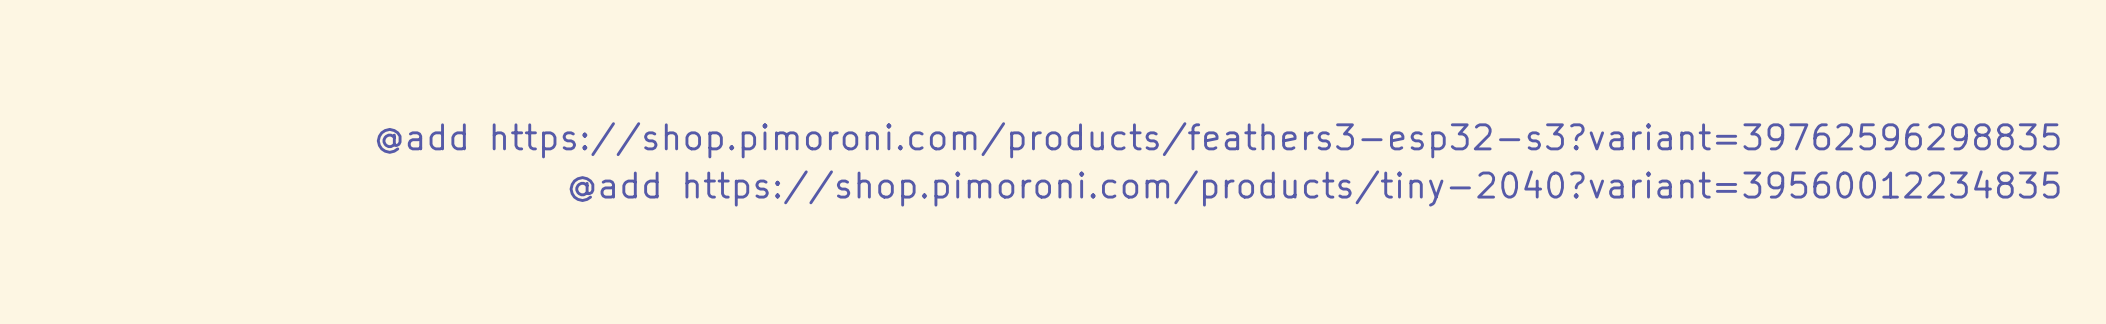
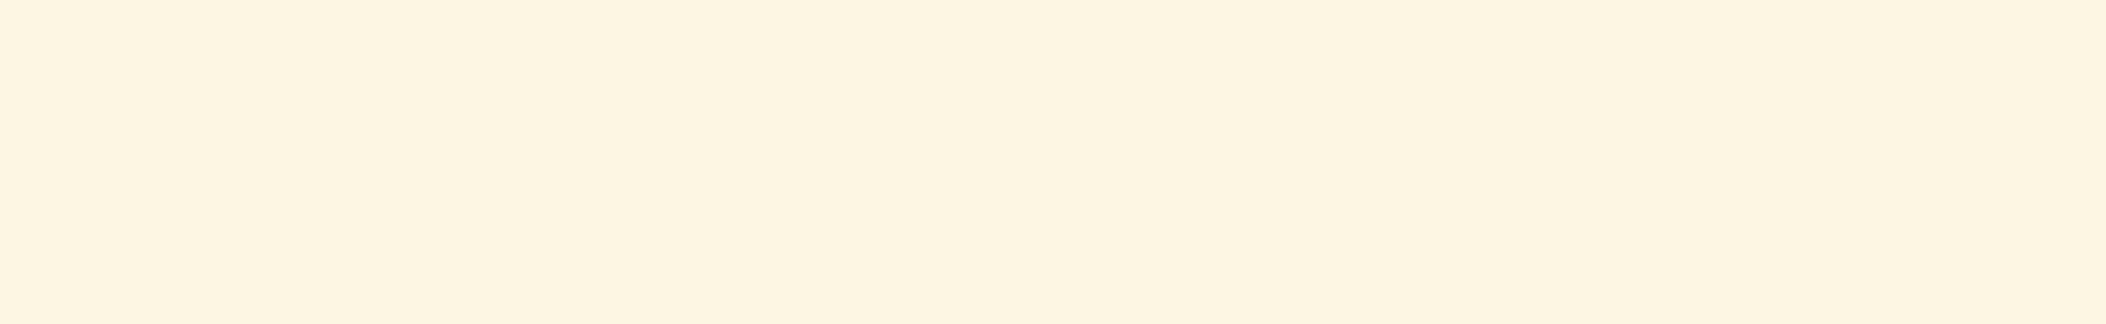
text: @add https://shop.pimoroni.com/products/feathers3-esp32-s3?variant=39762596298835 (1218, 140) -> none
text: @add https://shop.pimoroni.com/products/tiny-2040?variant=39560012234835 (1314, 188) -> none

